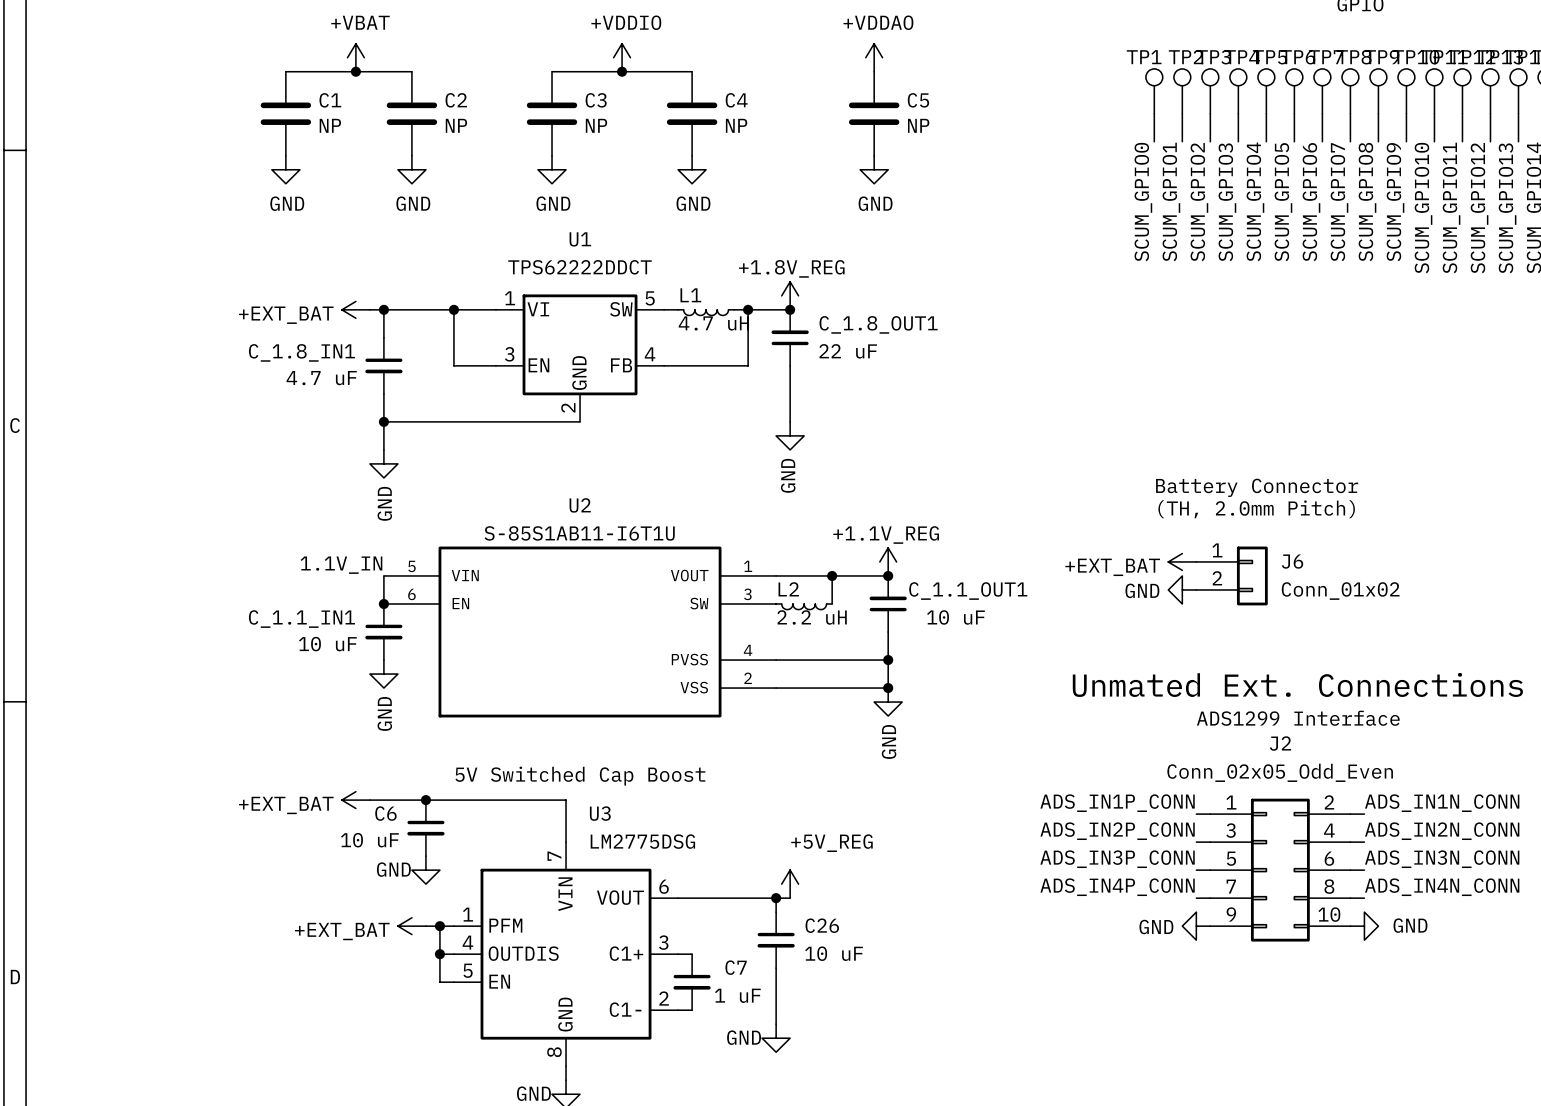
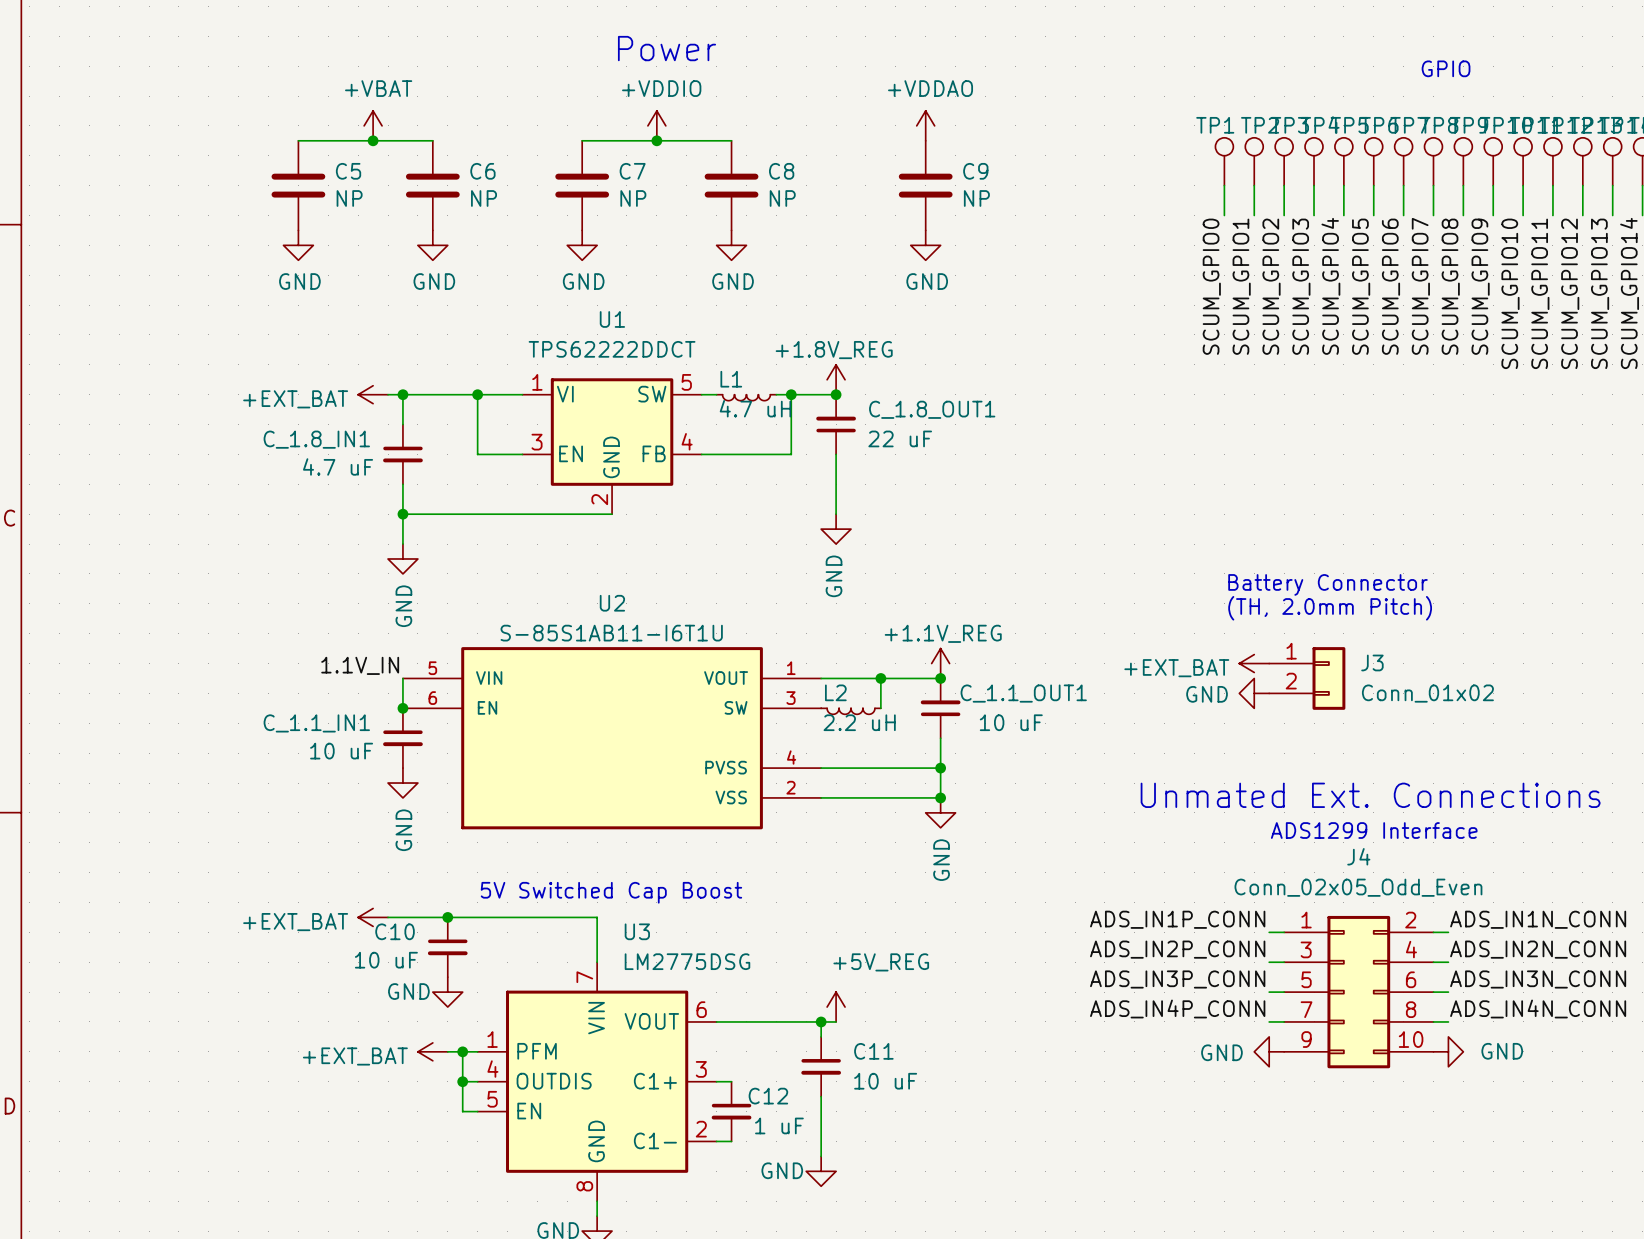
C1 name: C1 (330, 100) -> C5 (348, 171)
C2 name: C2 (456, 100) -> C6 (482, 171)
C3 name: C3 (596, 100) -> C7 (632, 171)
C4 name: C4 (736, 100) -> C8 (781, 171)
C5 name: C5 (918, 100) -> C9 (975, 171)
J6 name: J6 (1292, 561) -> J3 (1372, 662)
J2 name: J2 (1280, 743) -> J4 (1358, 856)
C6 name: C6 (385, 813) -> C10 (395, 931)
C26 name: C26 (822, 925) -> C11 (873, 1051)
C7 name: C7 (736, 967) -> C12 (768, 1096)

